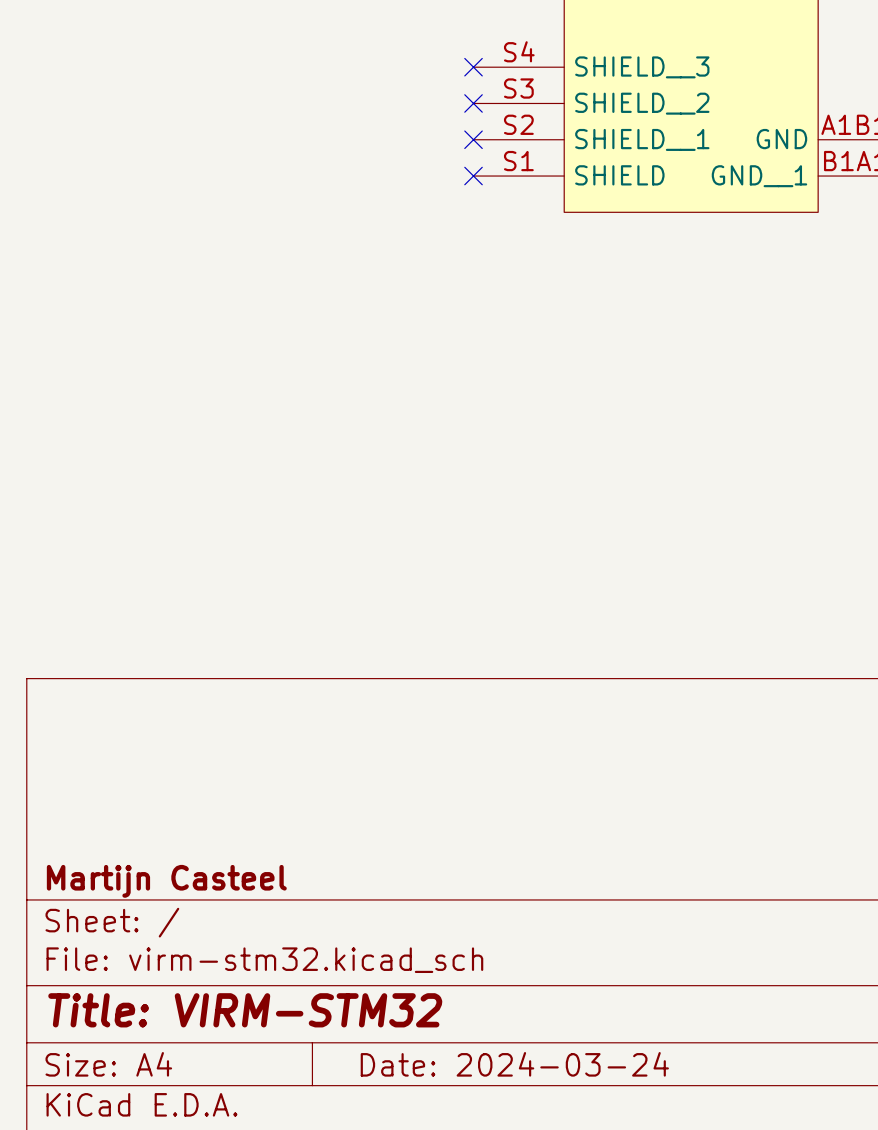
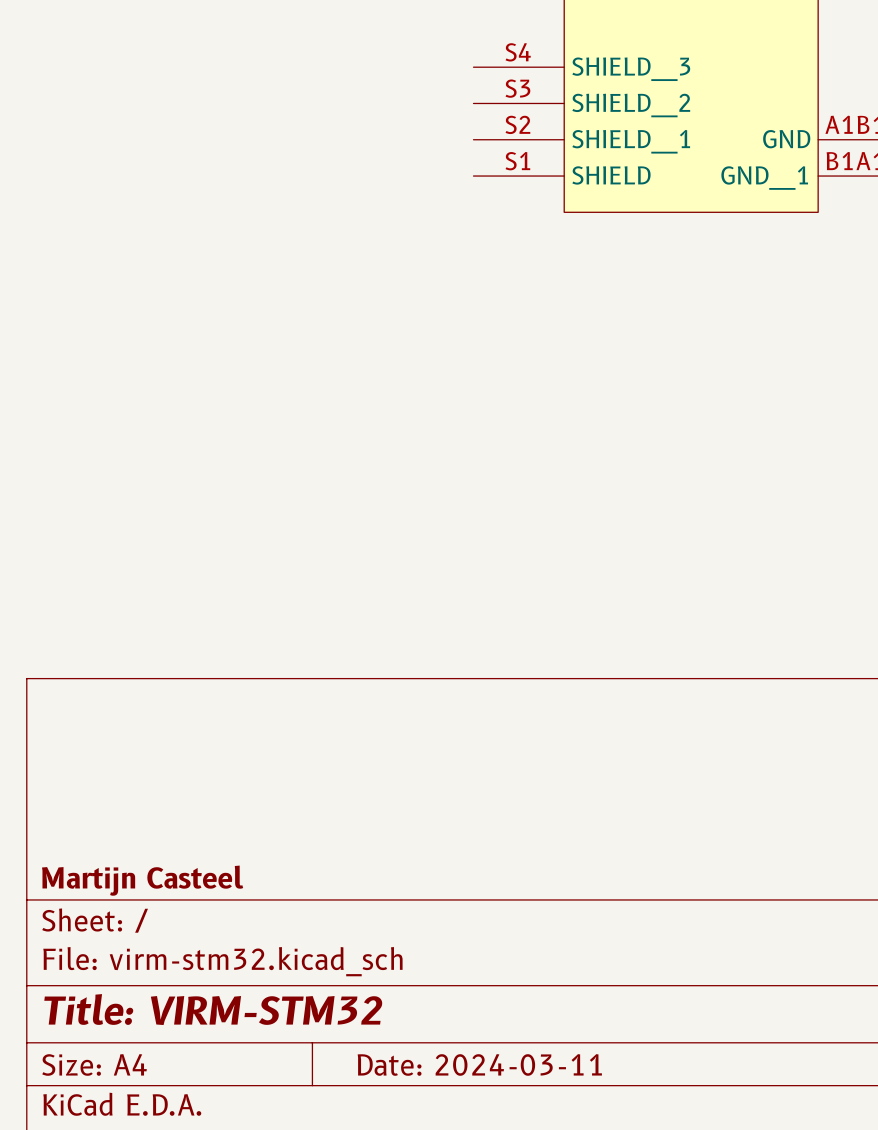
no-connect mark: (473, 67) -> none
no-connect mark: (473, 103) -> none
no-connect mark: (473, 139) -> none
no-connect mark: (473, 176) -> none
title block: Date: 2024-03-24 (514, 1064) -> Date: 2024-03-11 (479, 1064)

